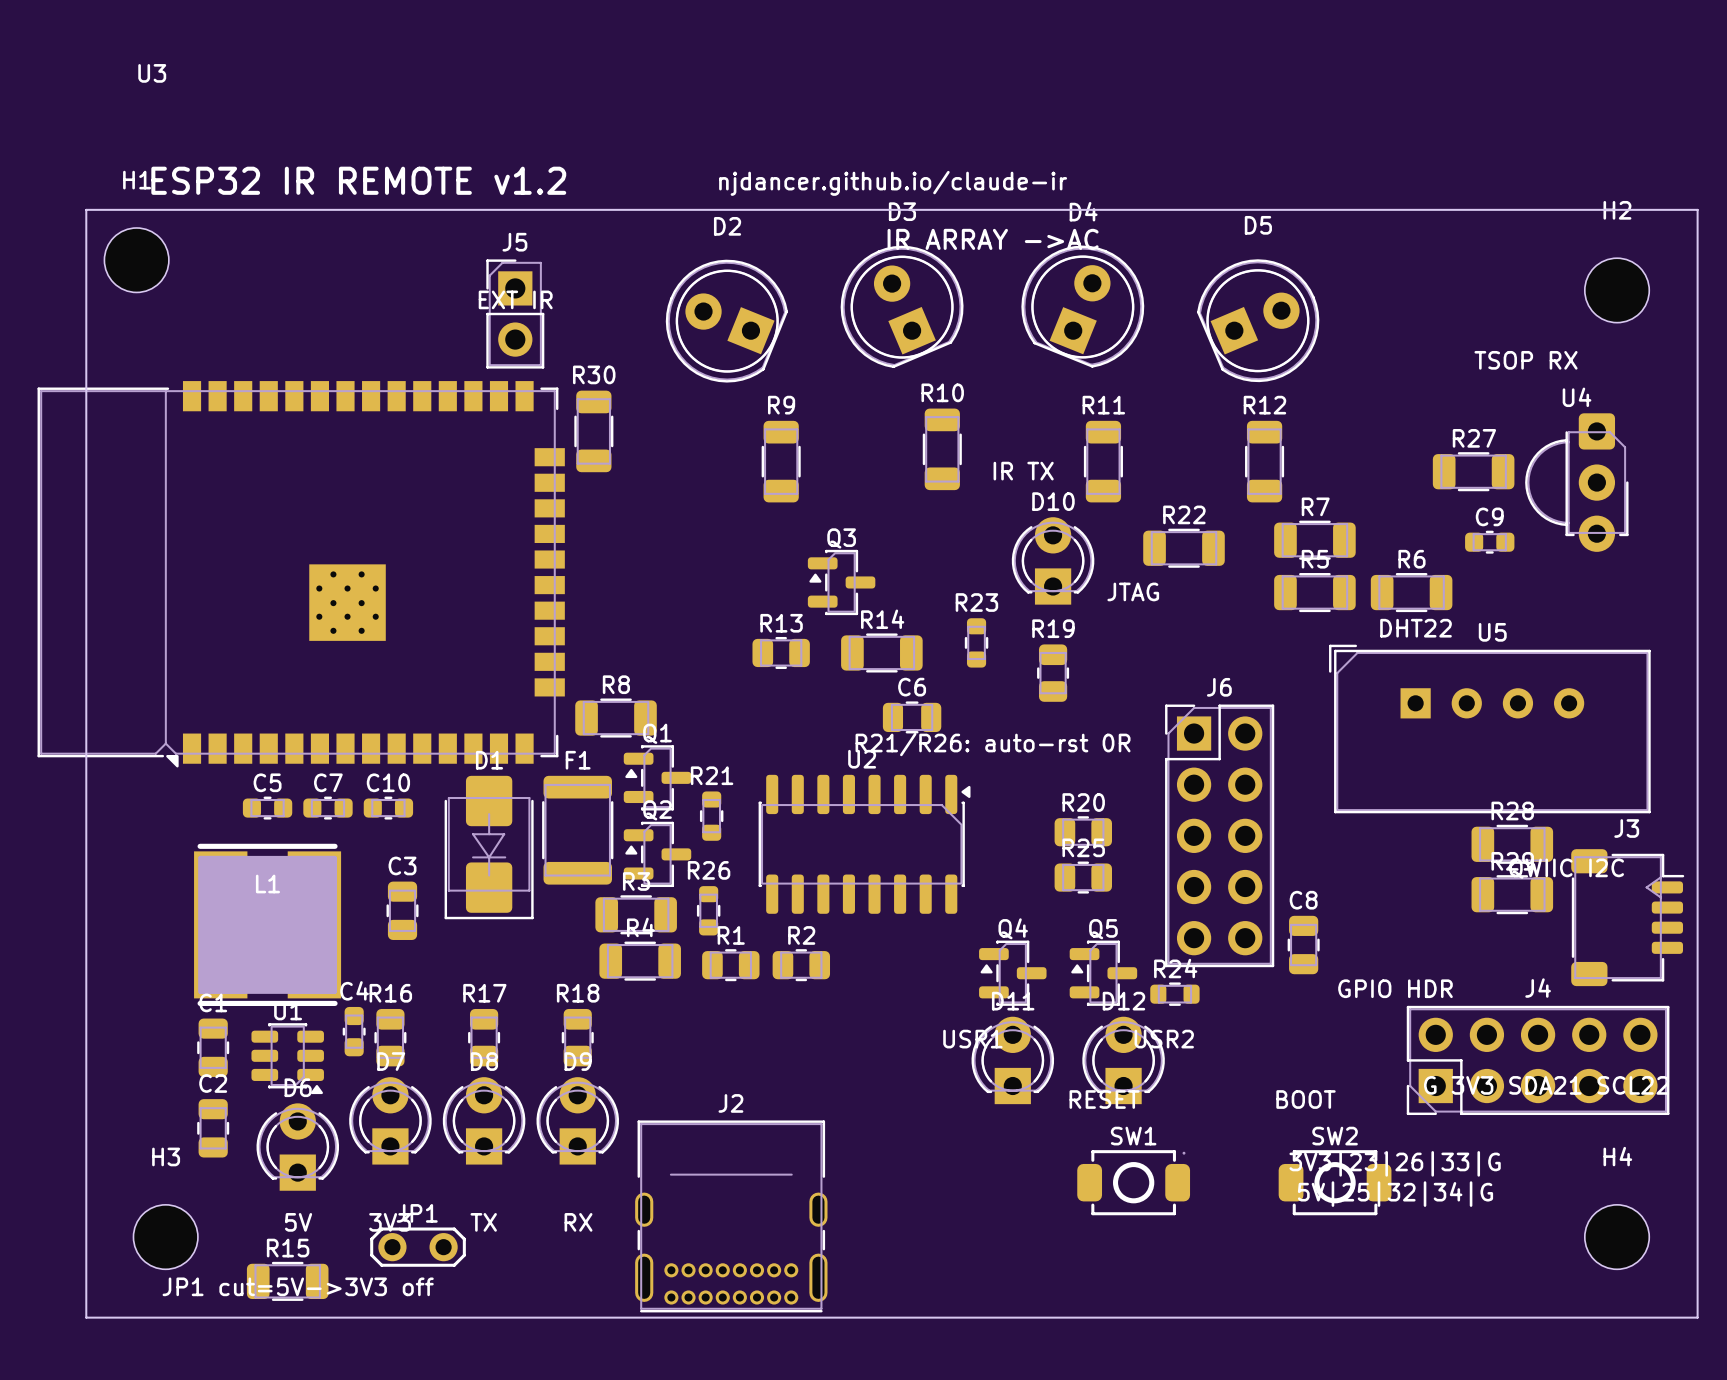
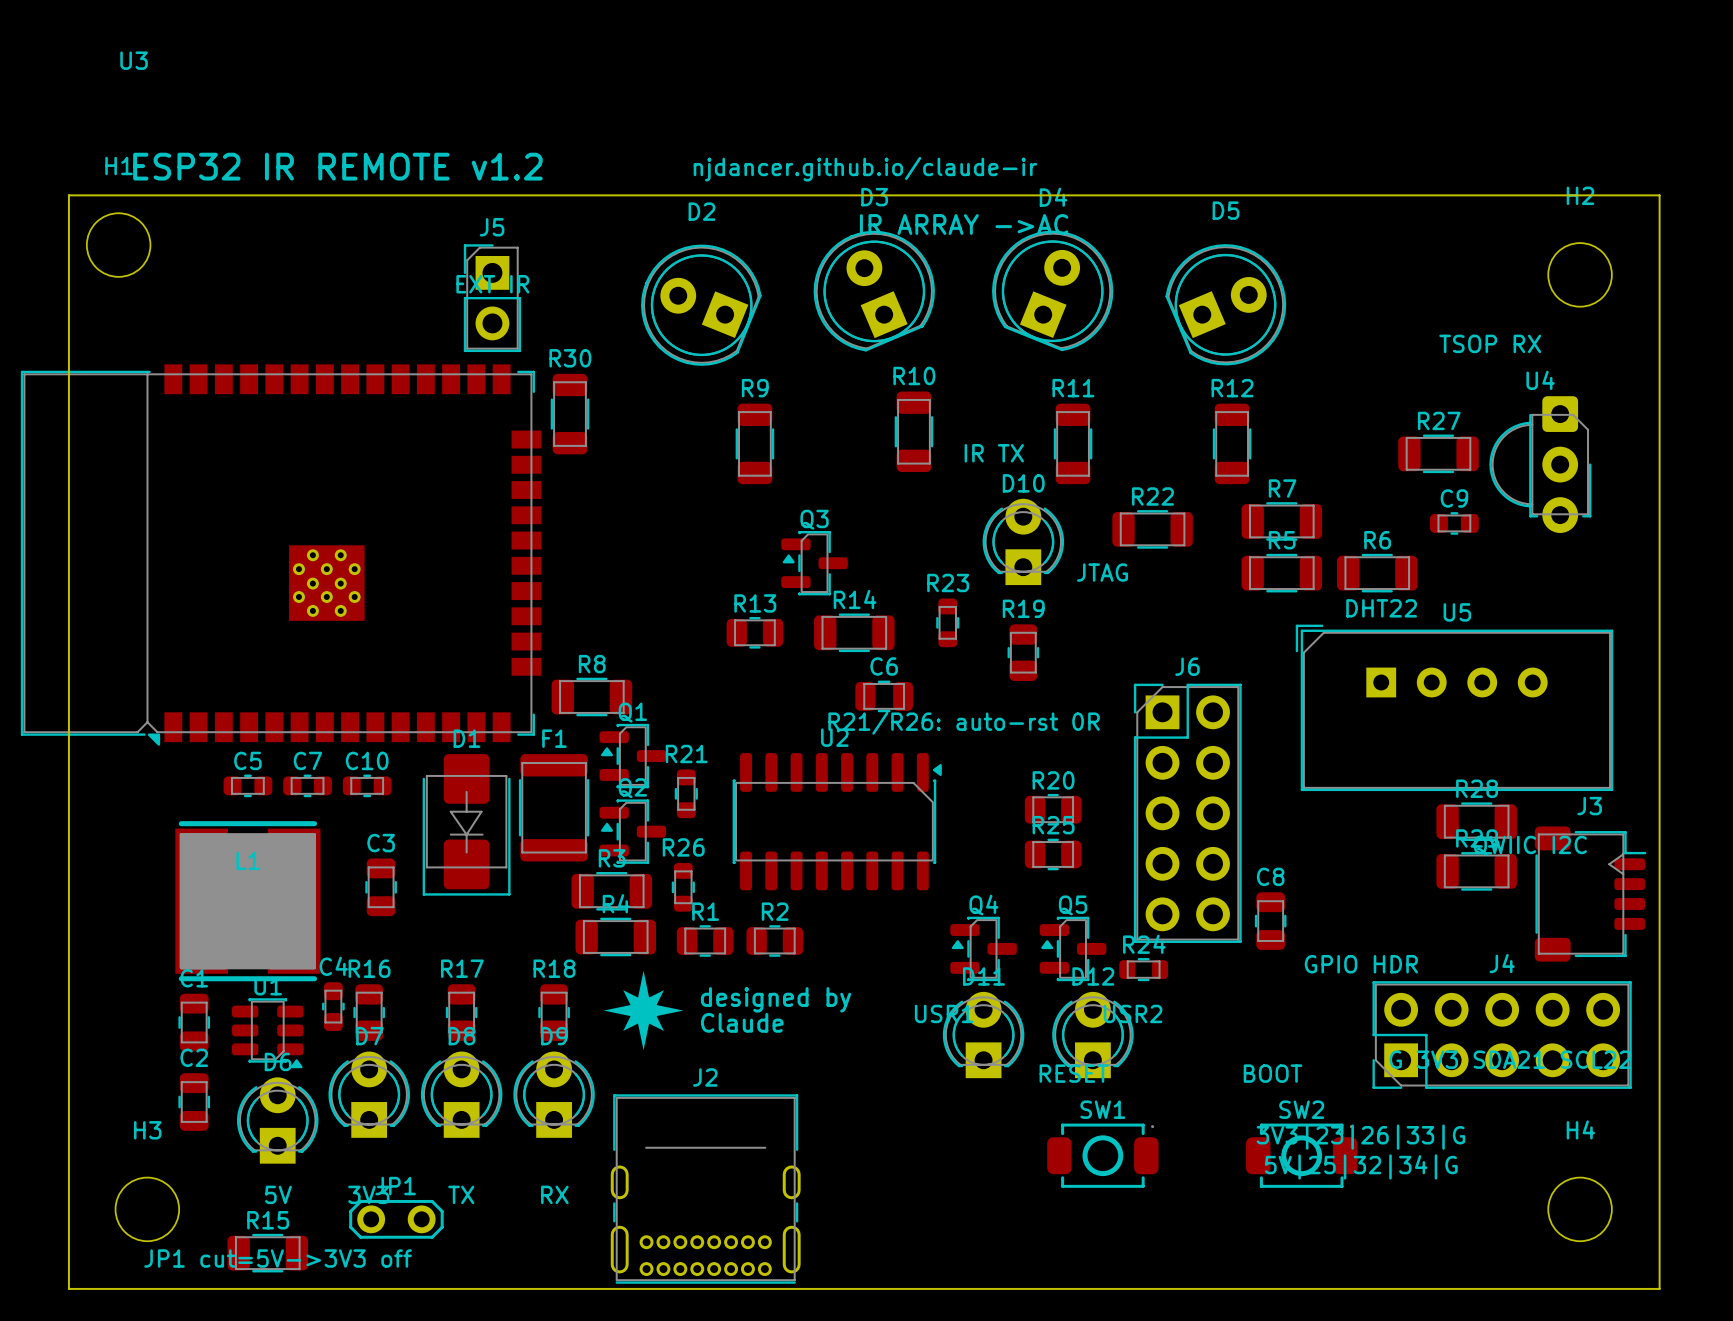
drawing: none -> [603, 970, 684, 1051]
text: none -> designed by (776, 999)
text: none -> Claude (742, 1022)

